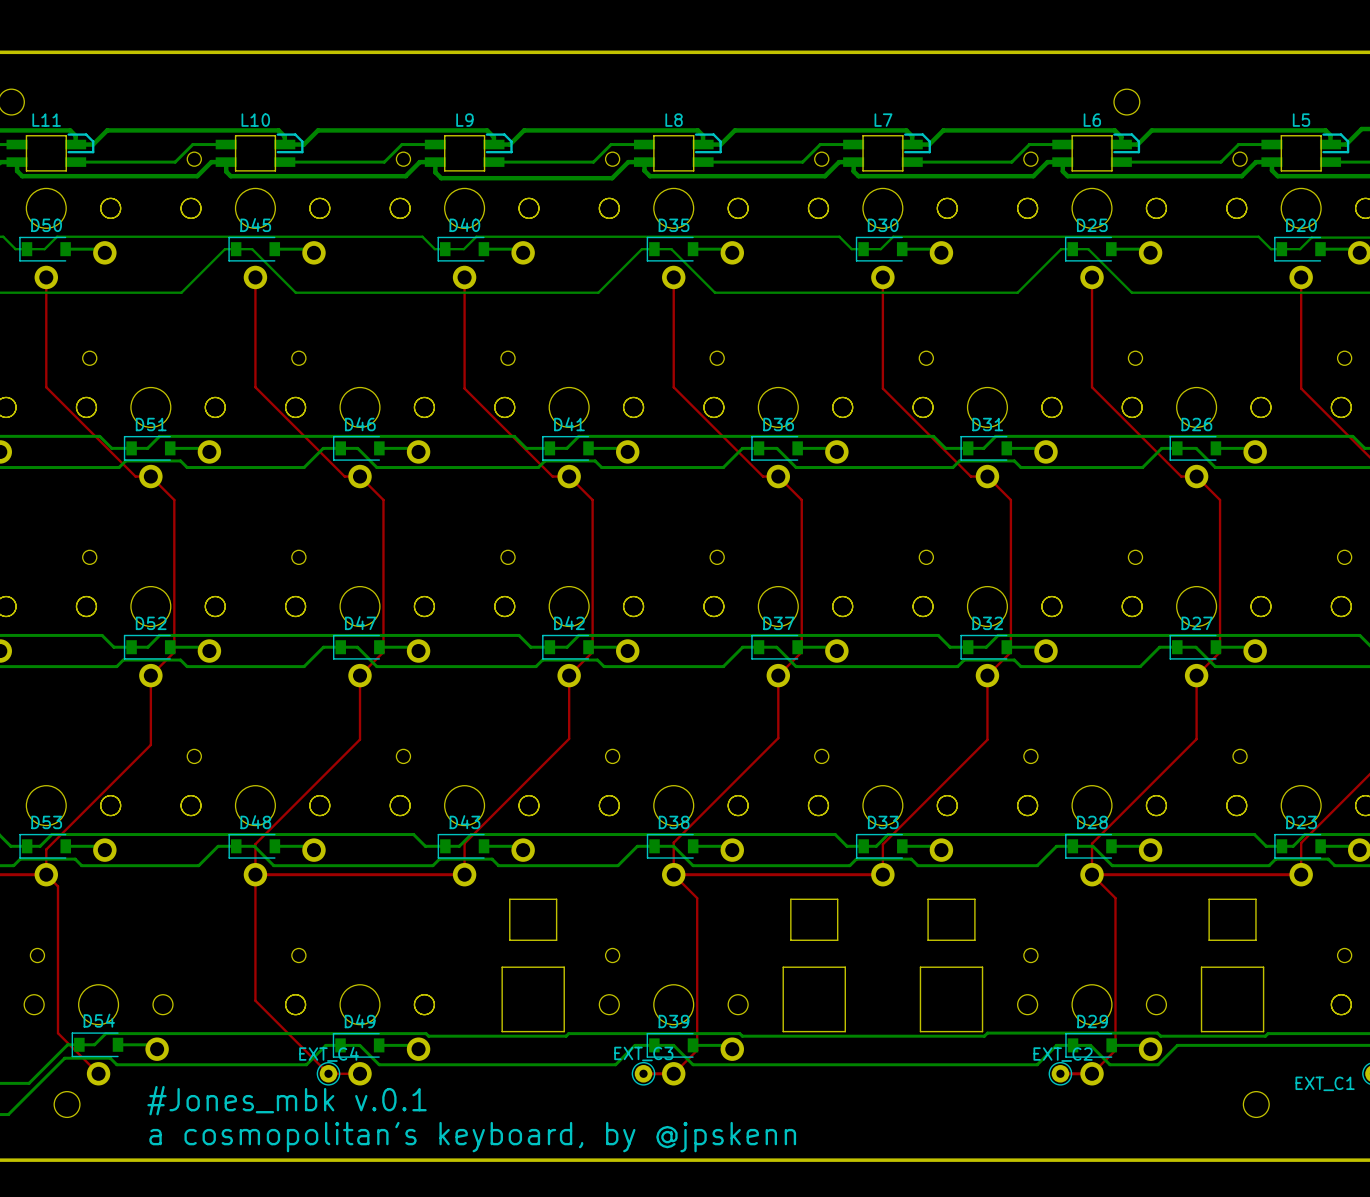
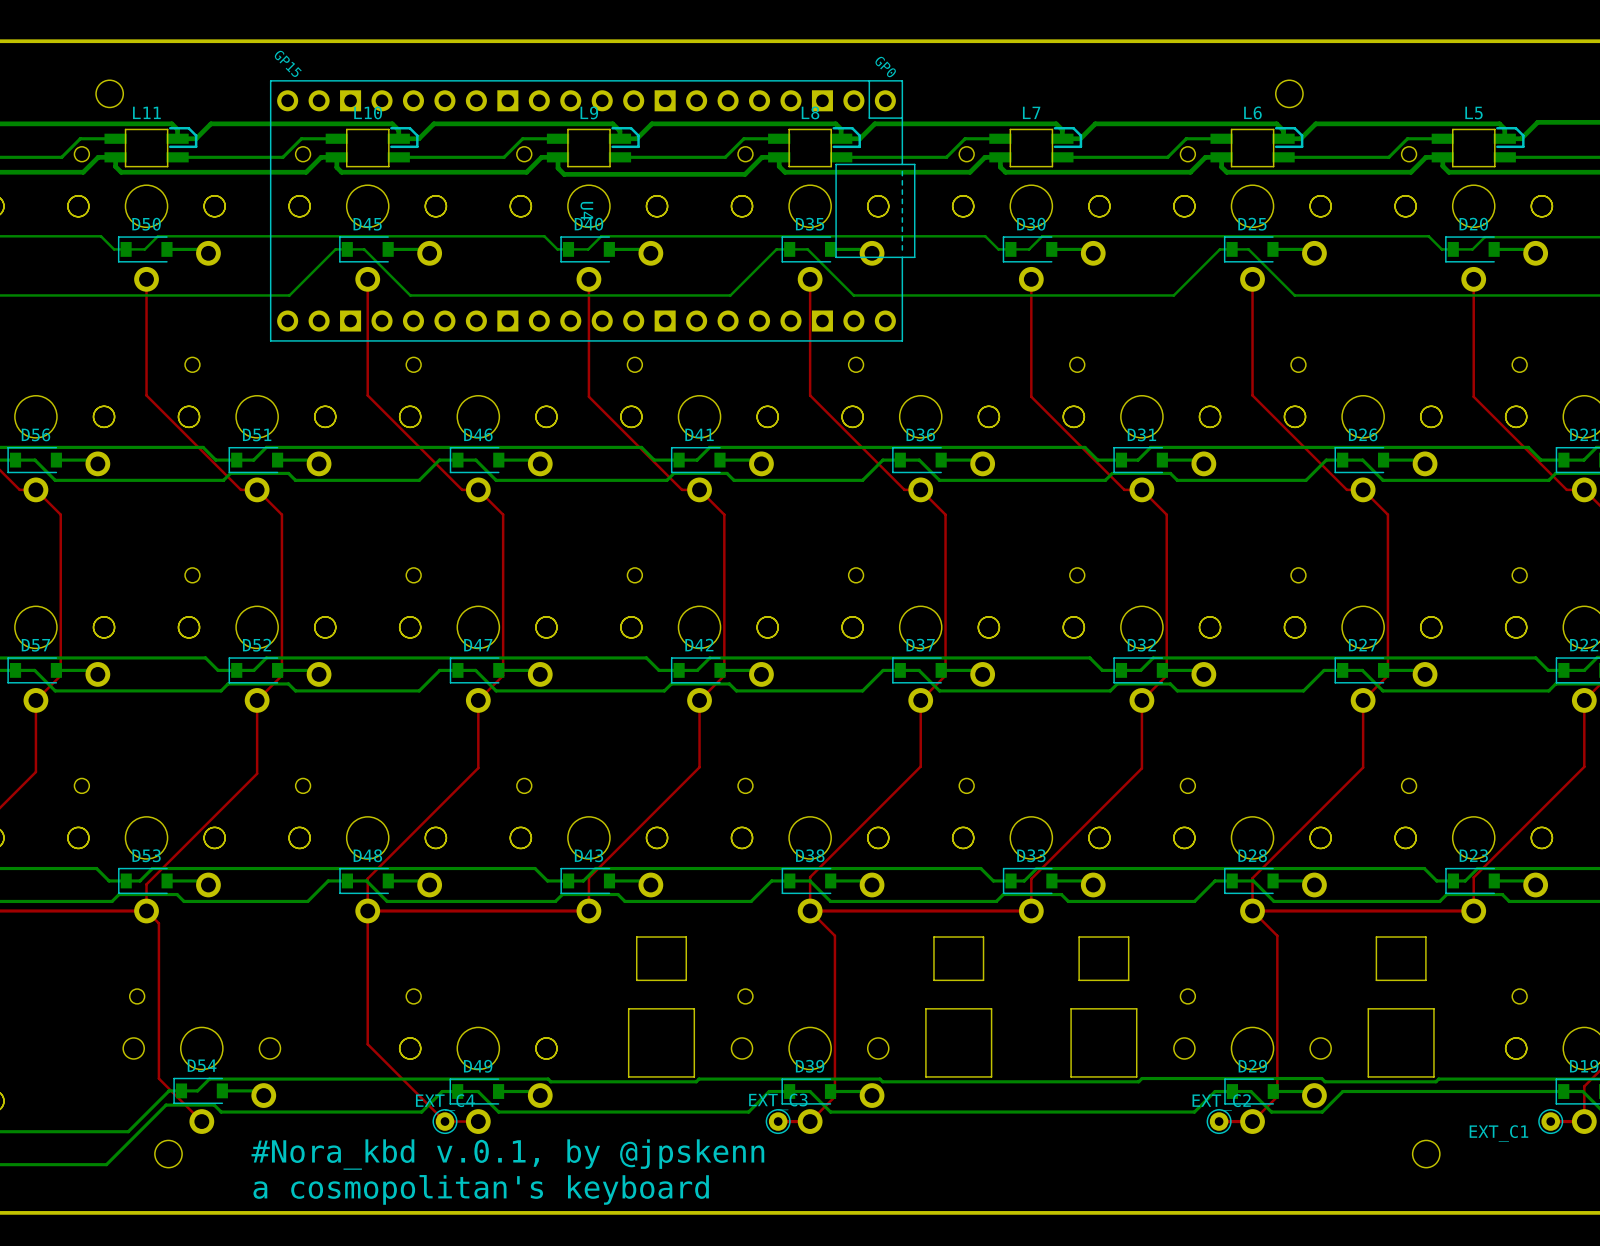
U4: none -> (592, 210)
text: #Jones_mbk v.0.1 (287, 1100) -> #Nora_kbd v.0.1, by @jpskenn (507, 1154)
text: a cosmopolitan's keyboard, by @jpskenn (472, 1137) -> a cosmopolitan's keyboard (481, 1189)

